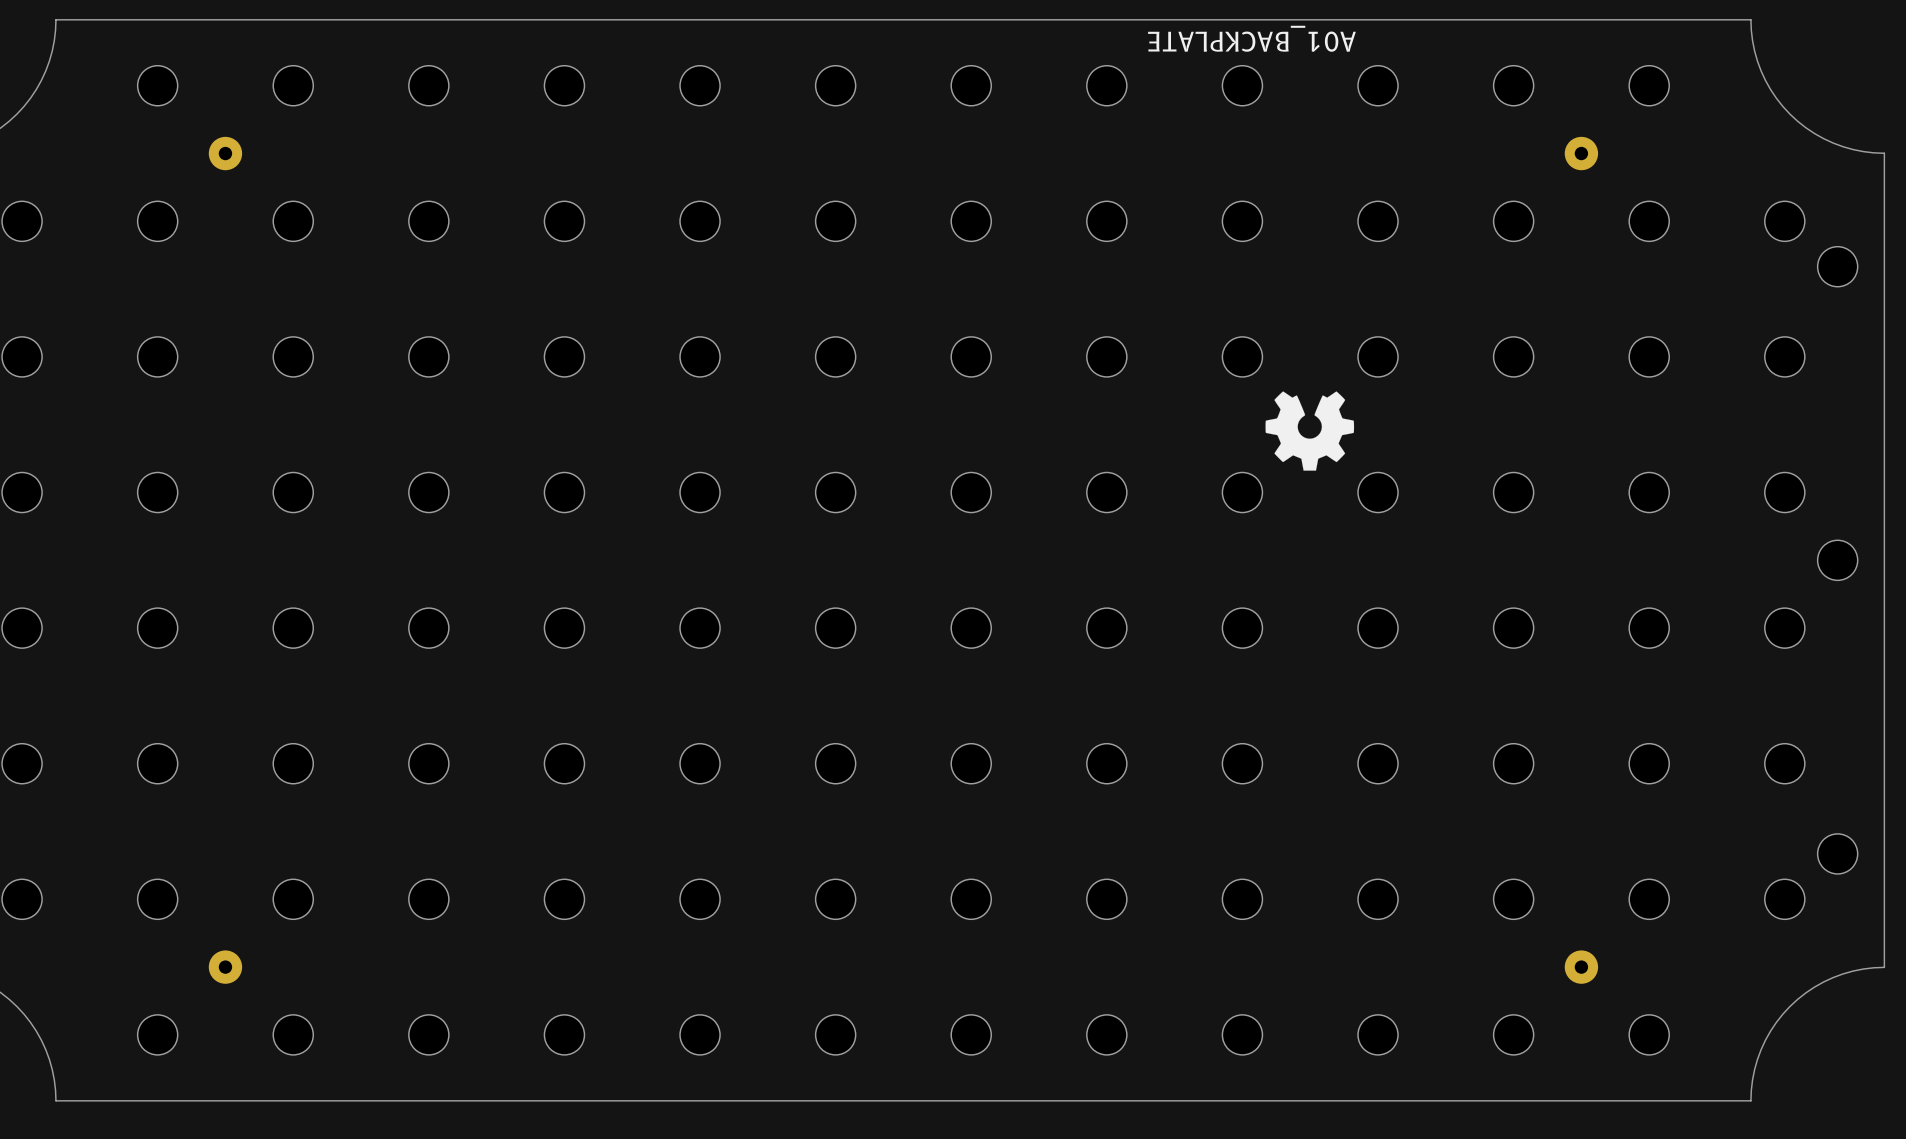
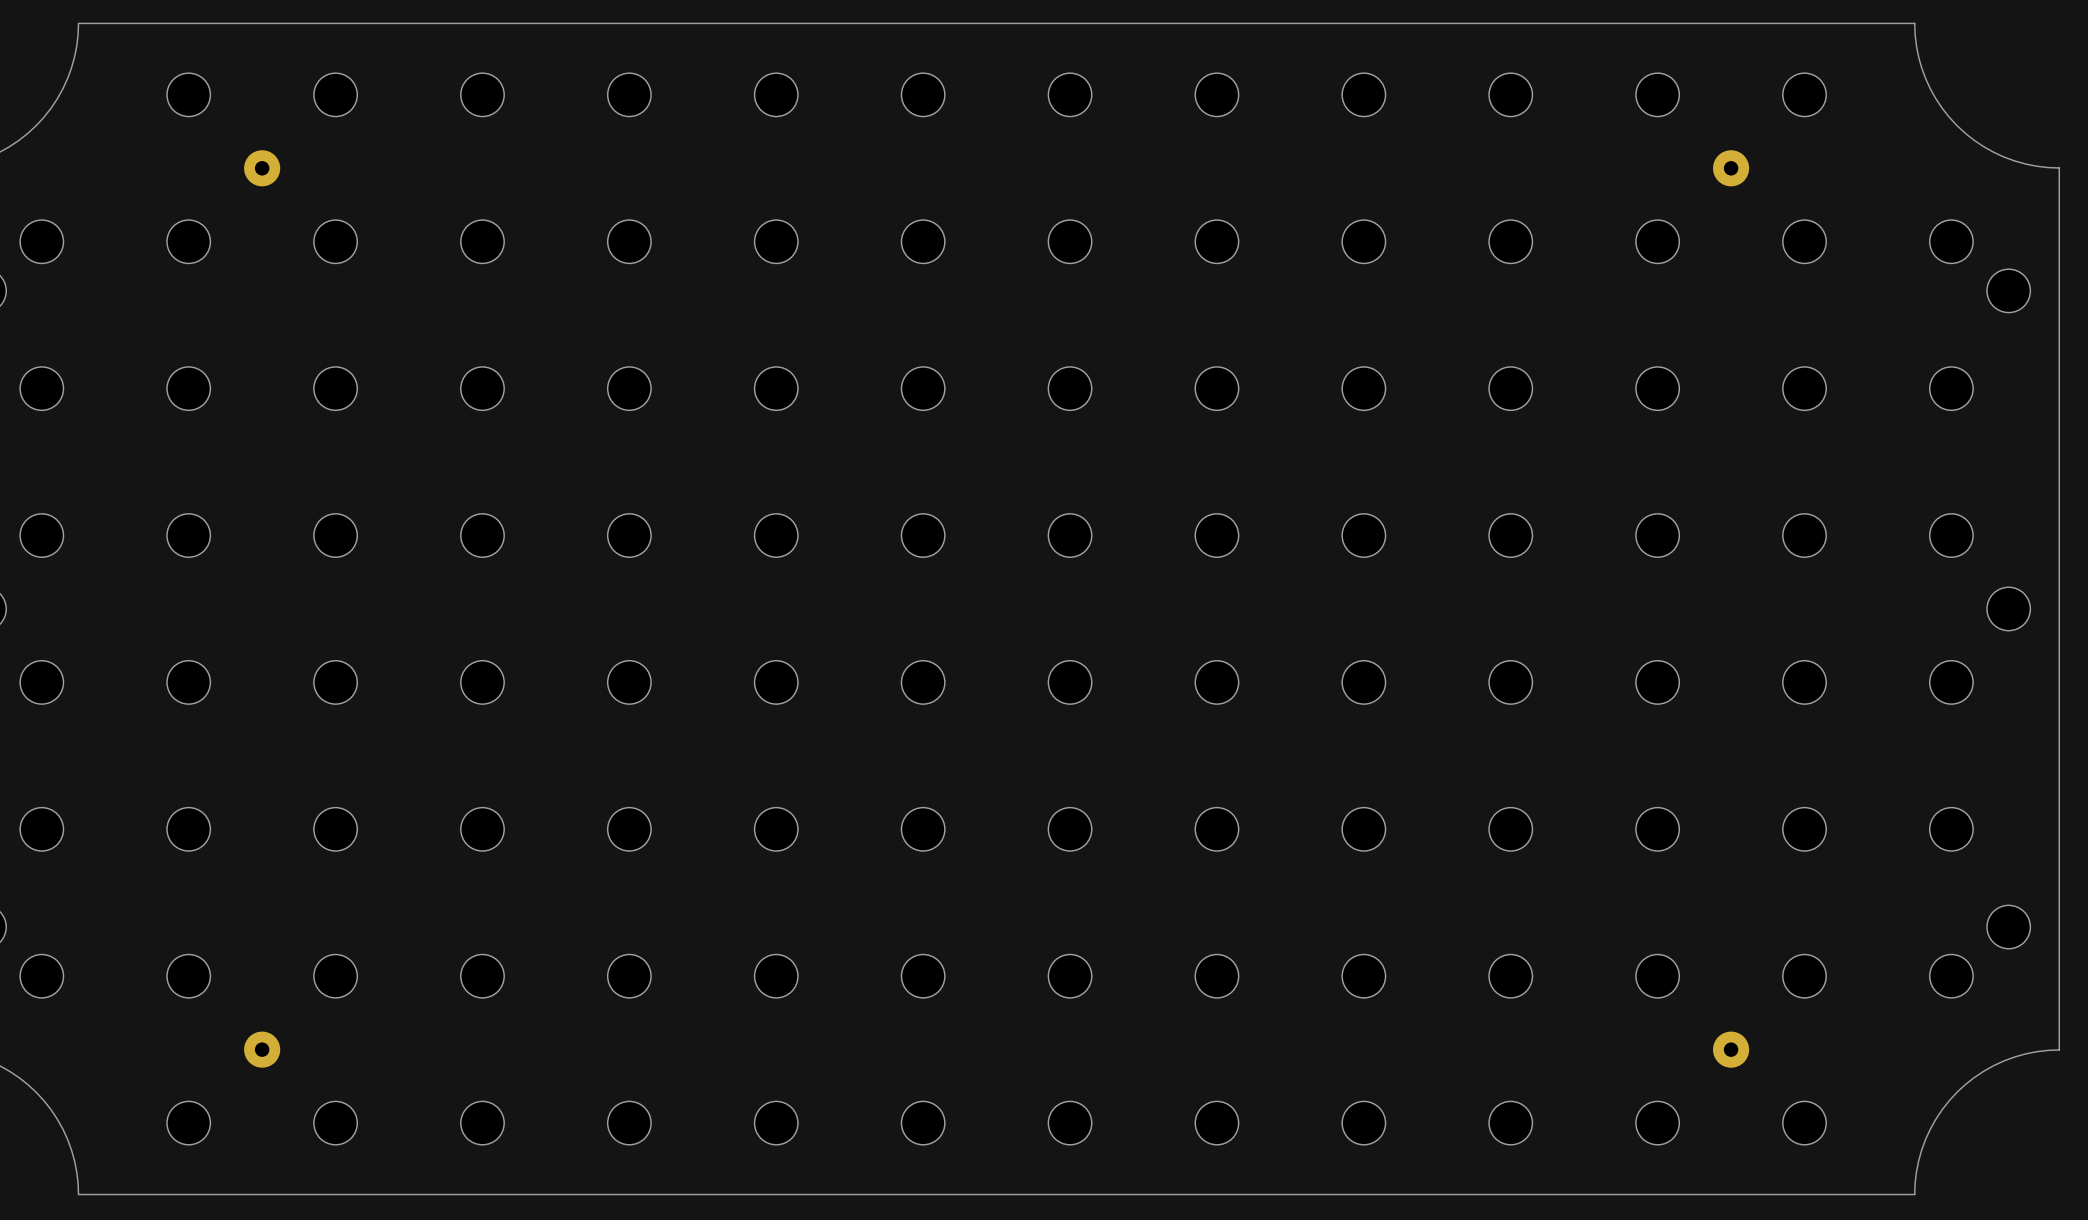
text: A01_BACKPLATE (1251, 38) -> none
drawing: [1265, 391, 1355, 471] -> none

